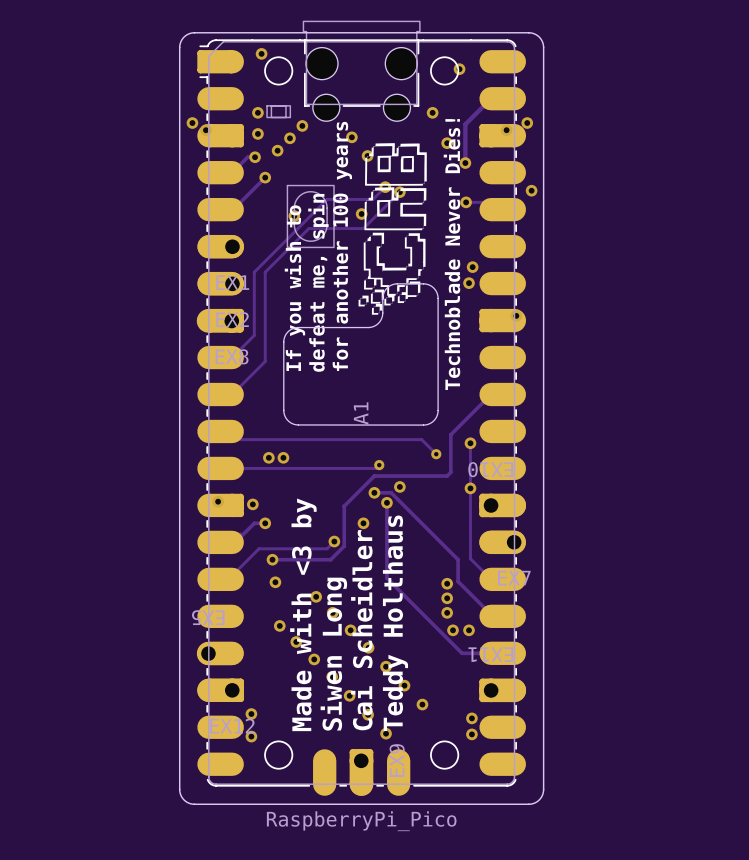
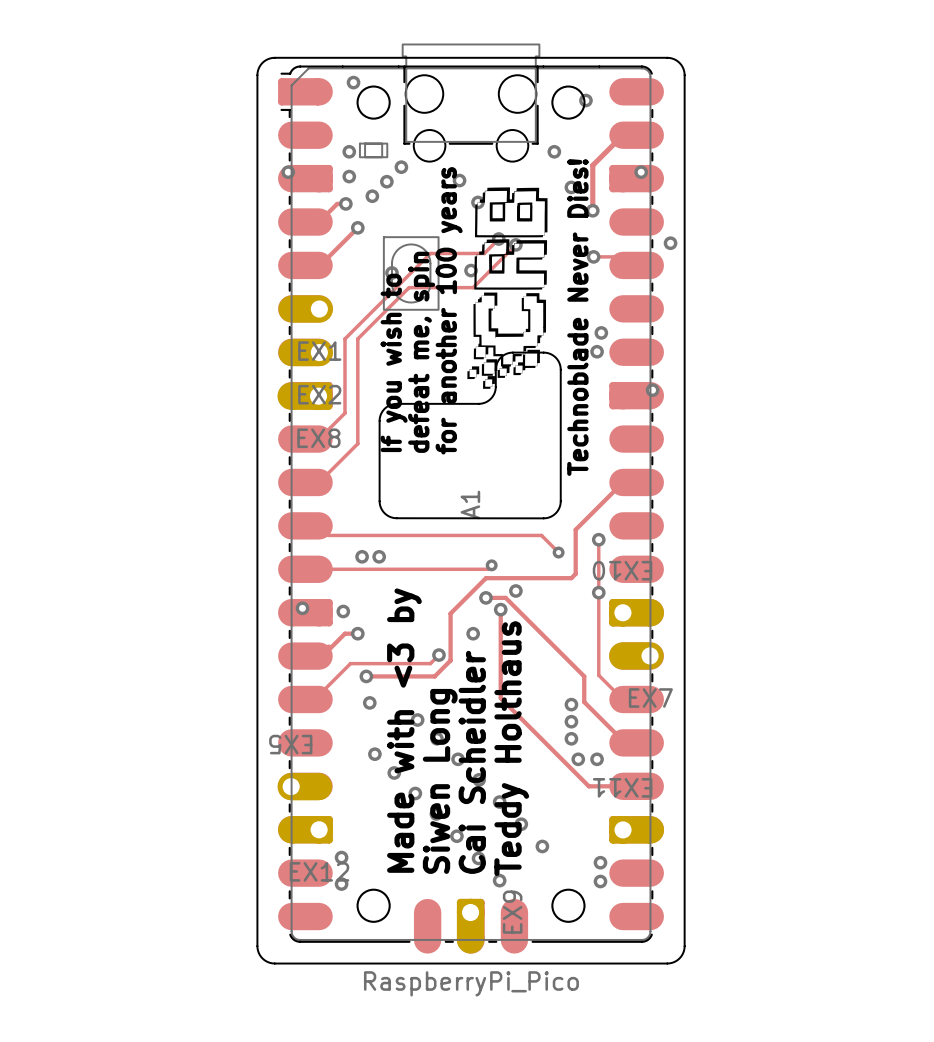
via: (192, 123) -> none
via: (527, 123) -> none

